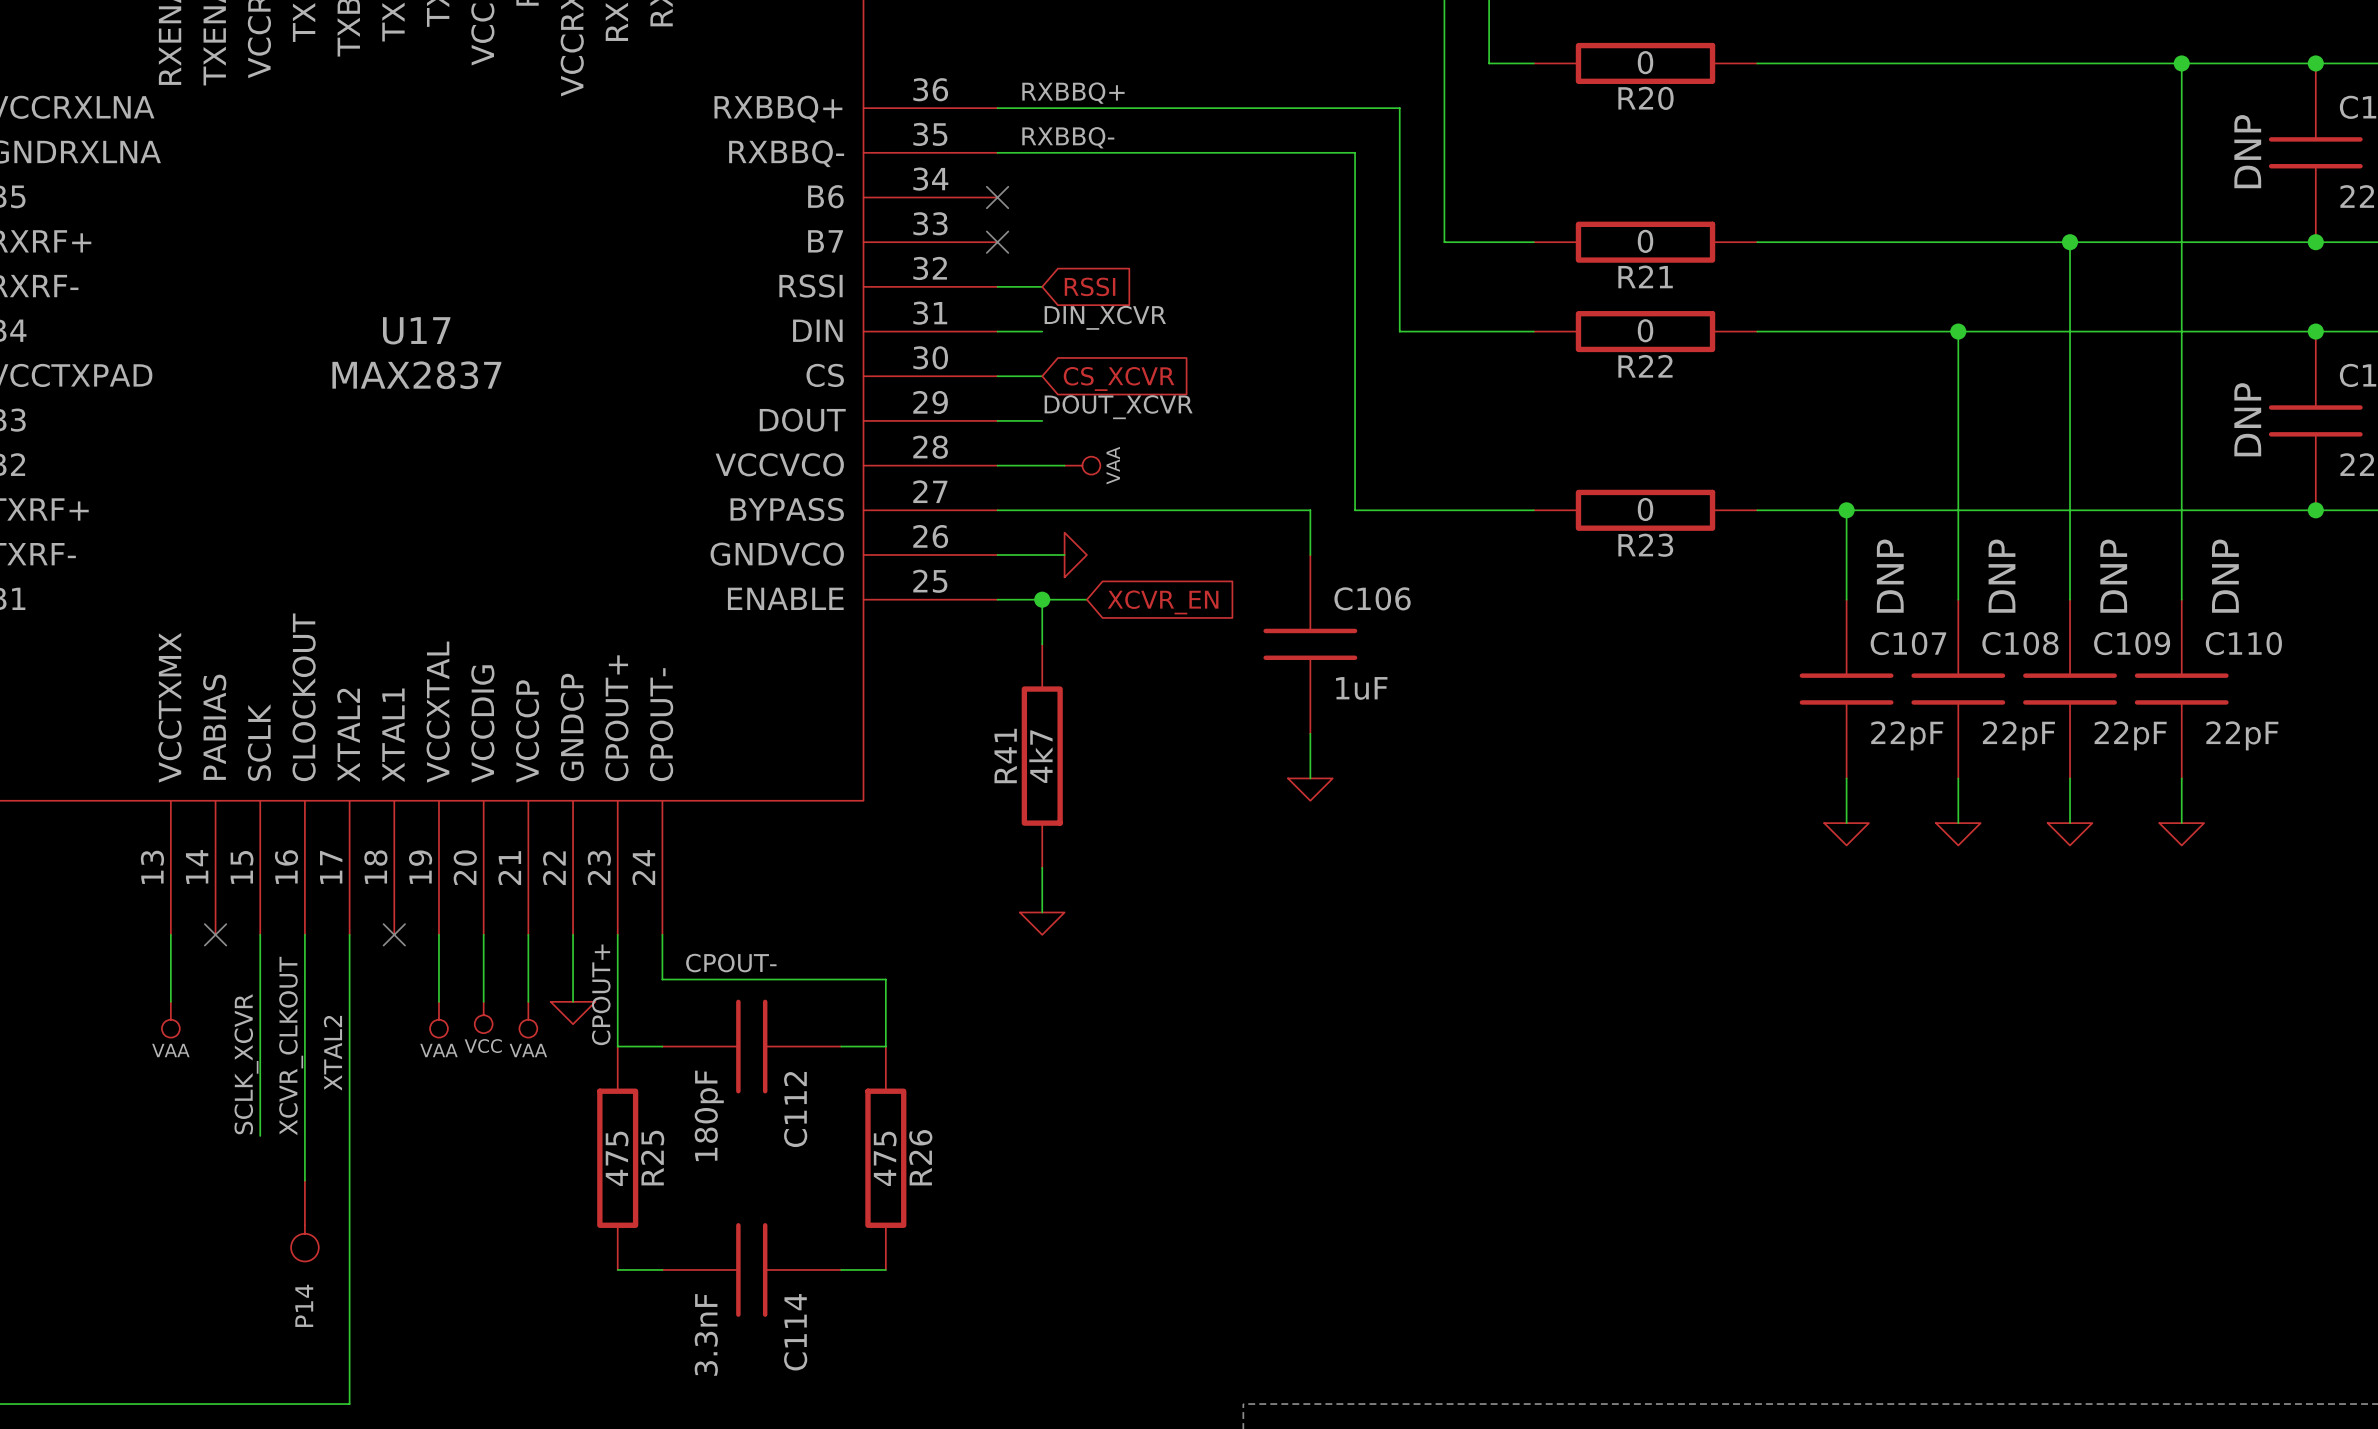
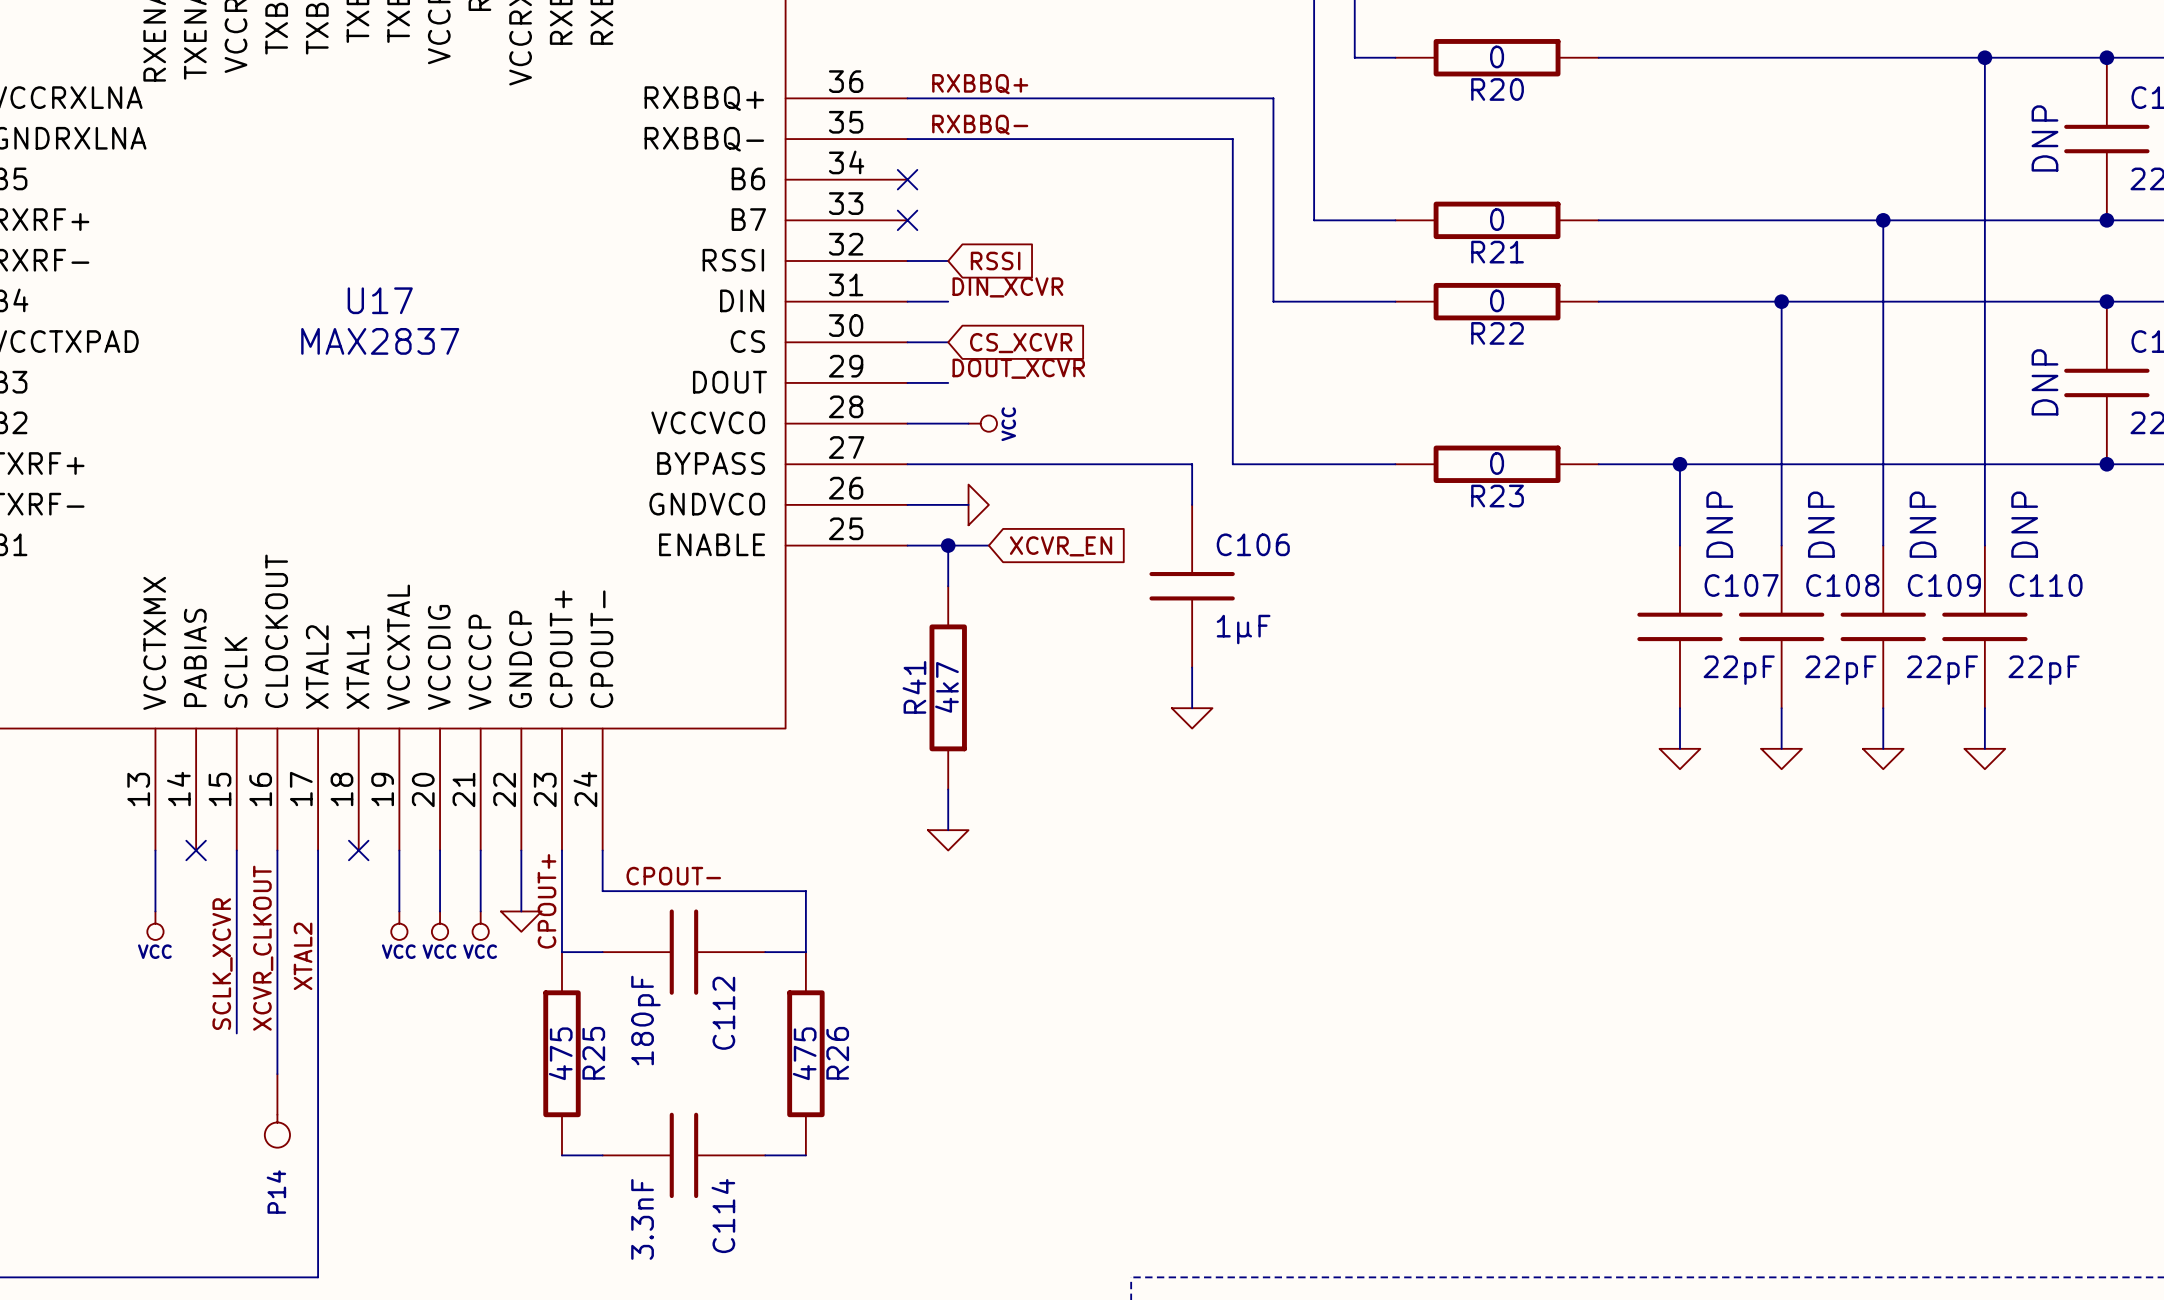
power symbol: VAA (1082, 465) -> VCC (982, 423)
C106 value: 1uF (1361, 688) -> 1μF (1243, 629)
power symbol: VAA (170, 1019) -> VCC (155, 925)
power symbol: VAA (438, 1019) -> VCC (399, 925)
power symbol: VAA (528, 1019) -> VCC (480, 925)

